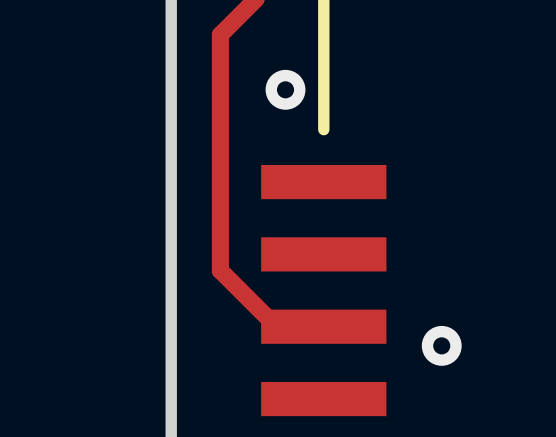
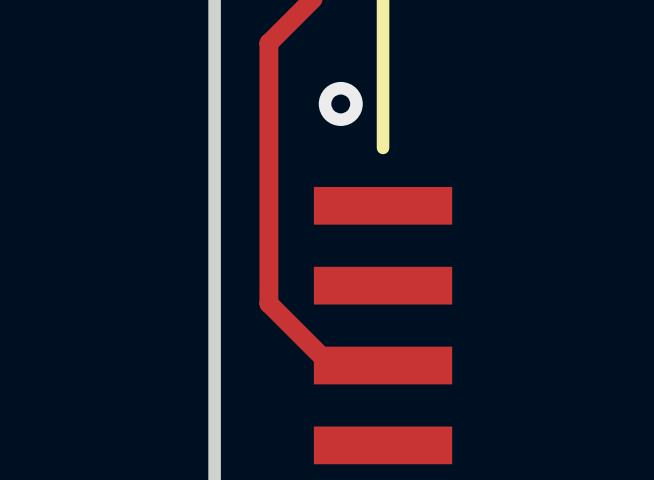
via: (441, 345) -> none

